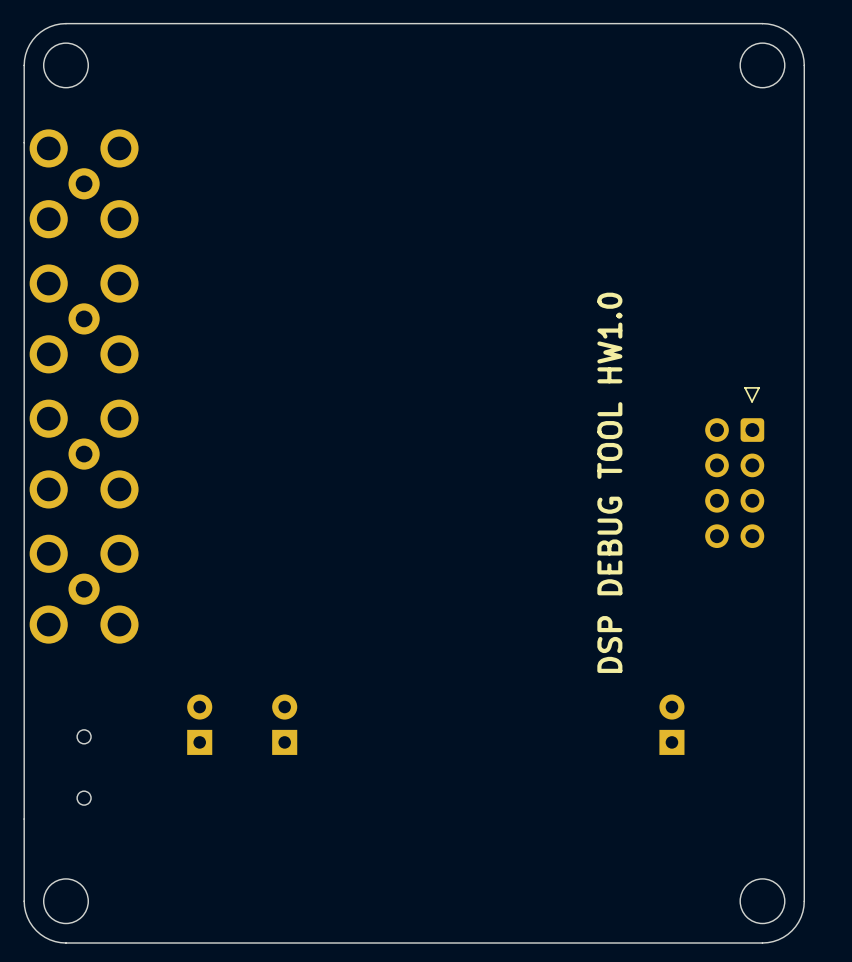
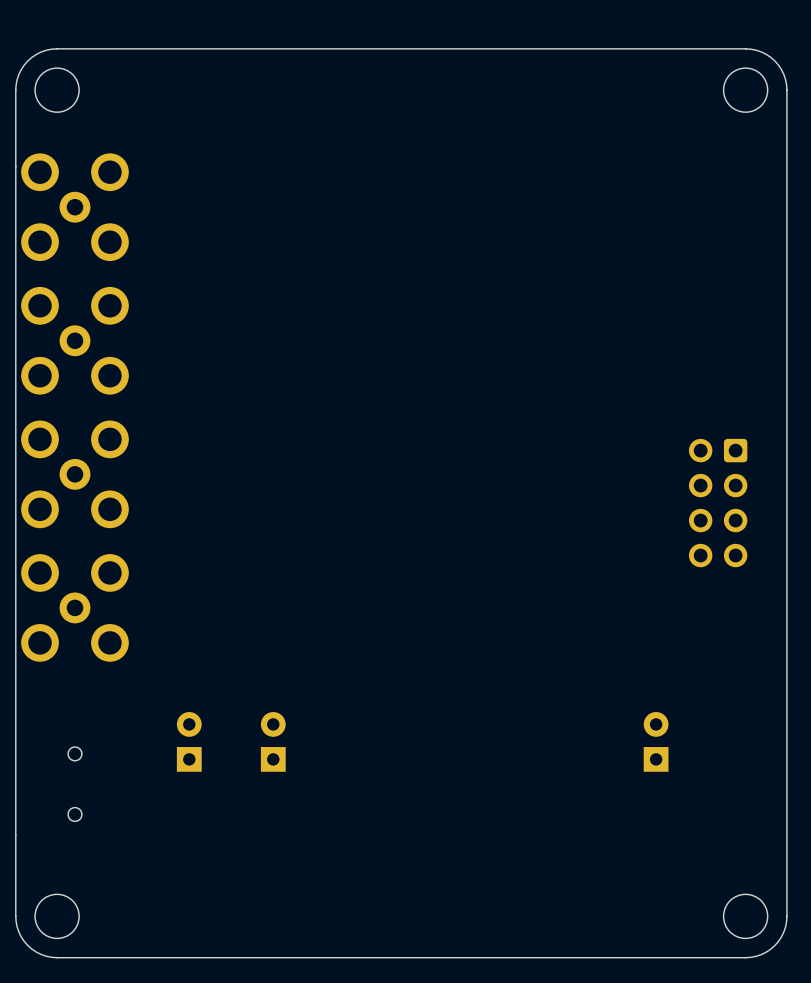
line: (759, 387) (745, 387) (752, 401) (759, 387) -> none
text: DSP DEBUG TOOL HW1.0 (609, 482) -> none

